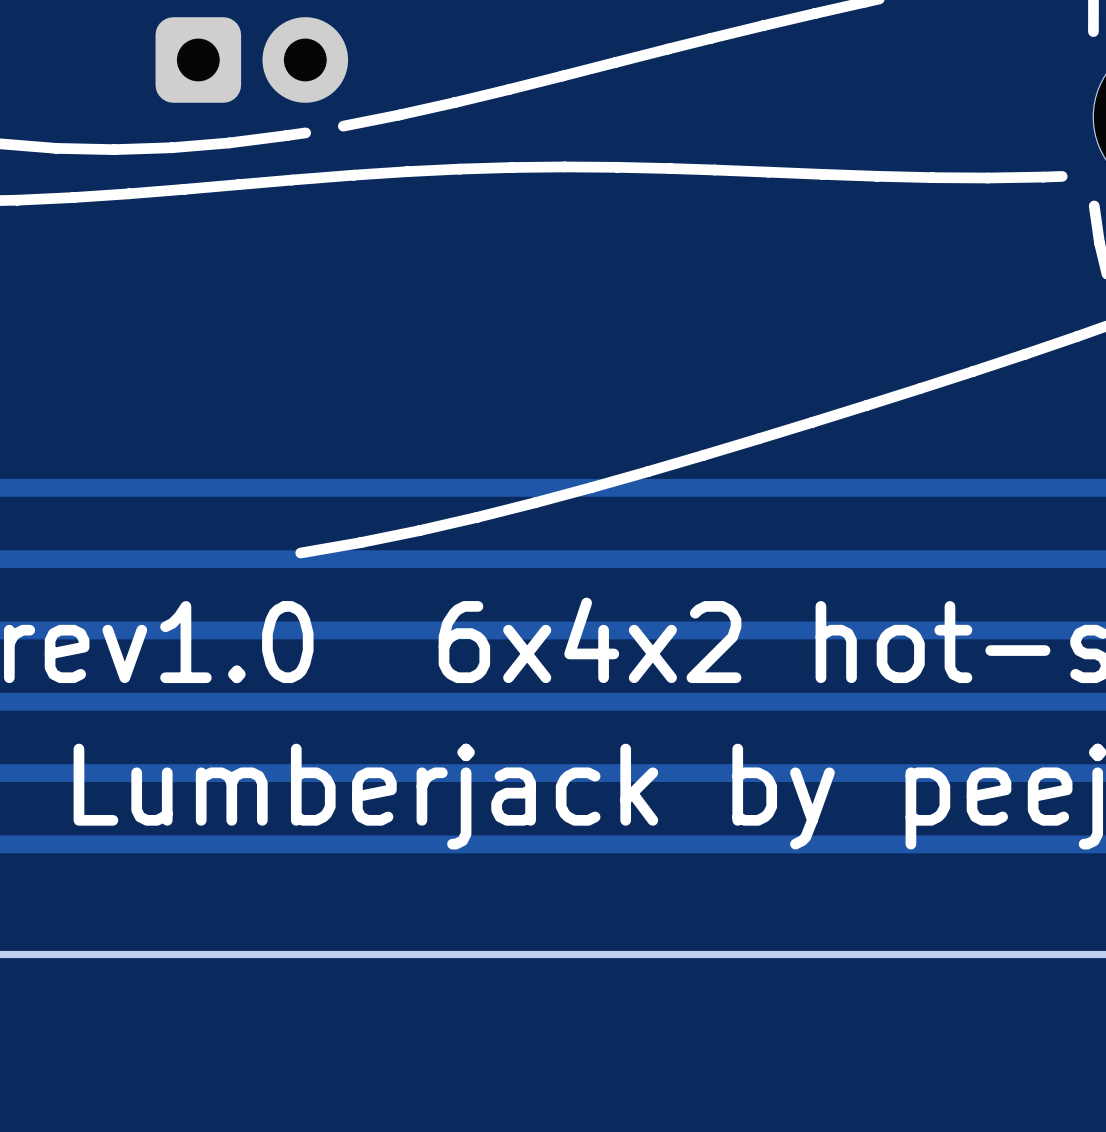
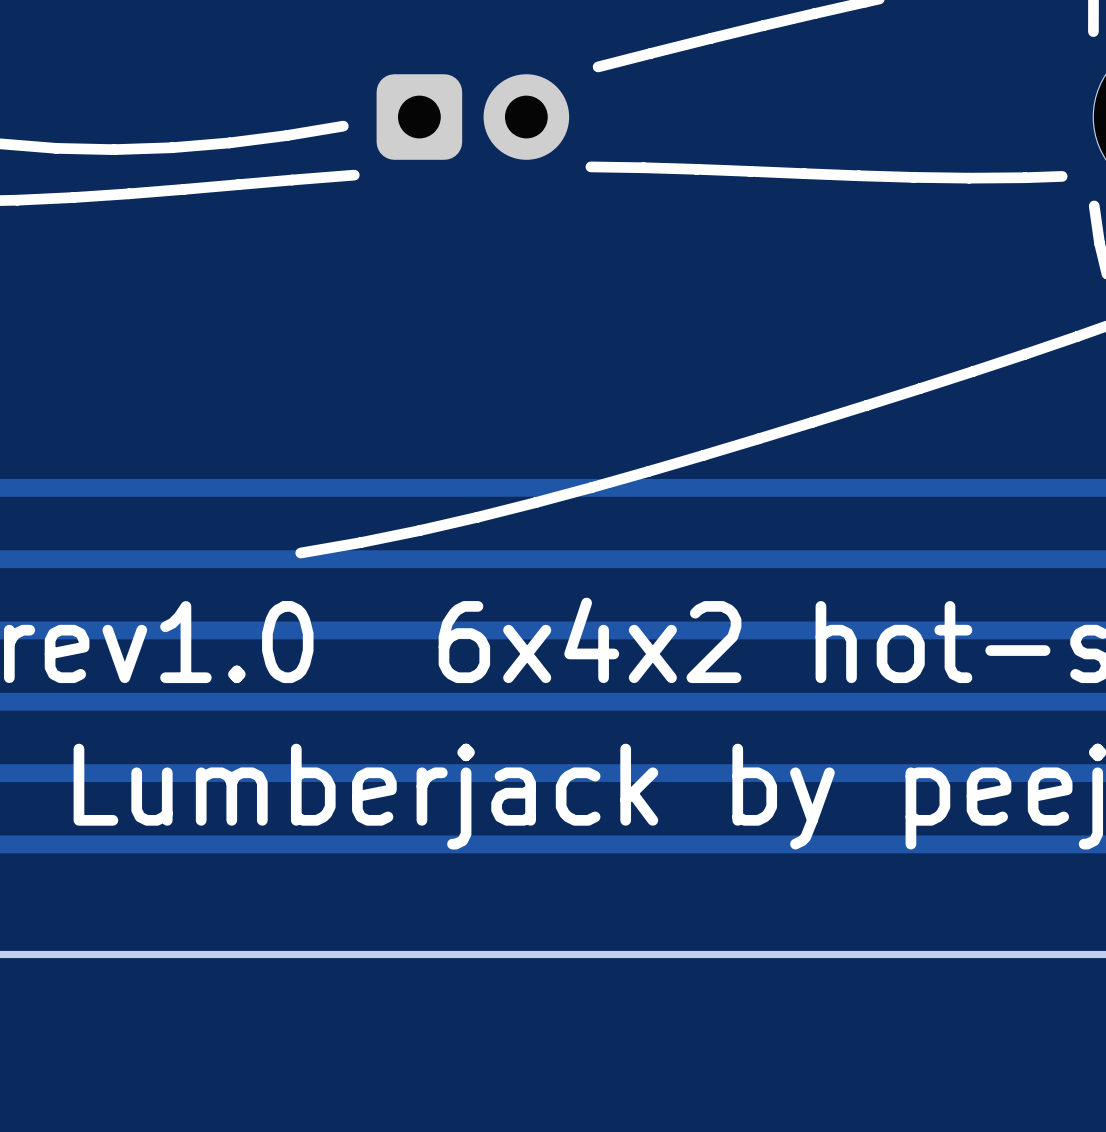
line: (711, 38) (454, 102) (343, 126) -> (711, 38) (598, 66)
part position: (251, 59) -> (472, 117)
line: (305, 132) (286, 135) -> (343, 126) (286, 135)
line: (354, 175) (459, 169) (564, 166) (932, 177) (1043, 177) -> (590, 166) (913, 177) (1043, 177)

